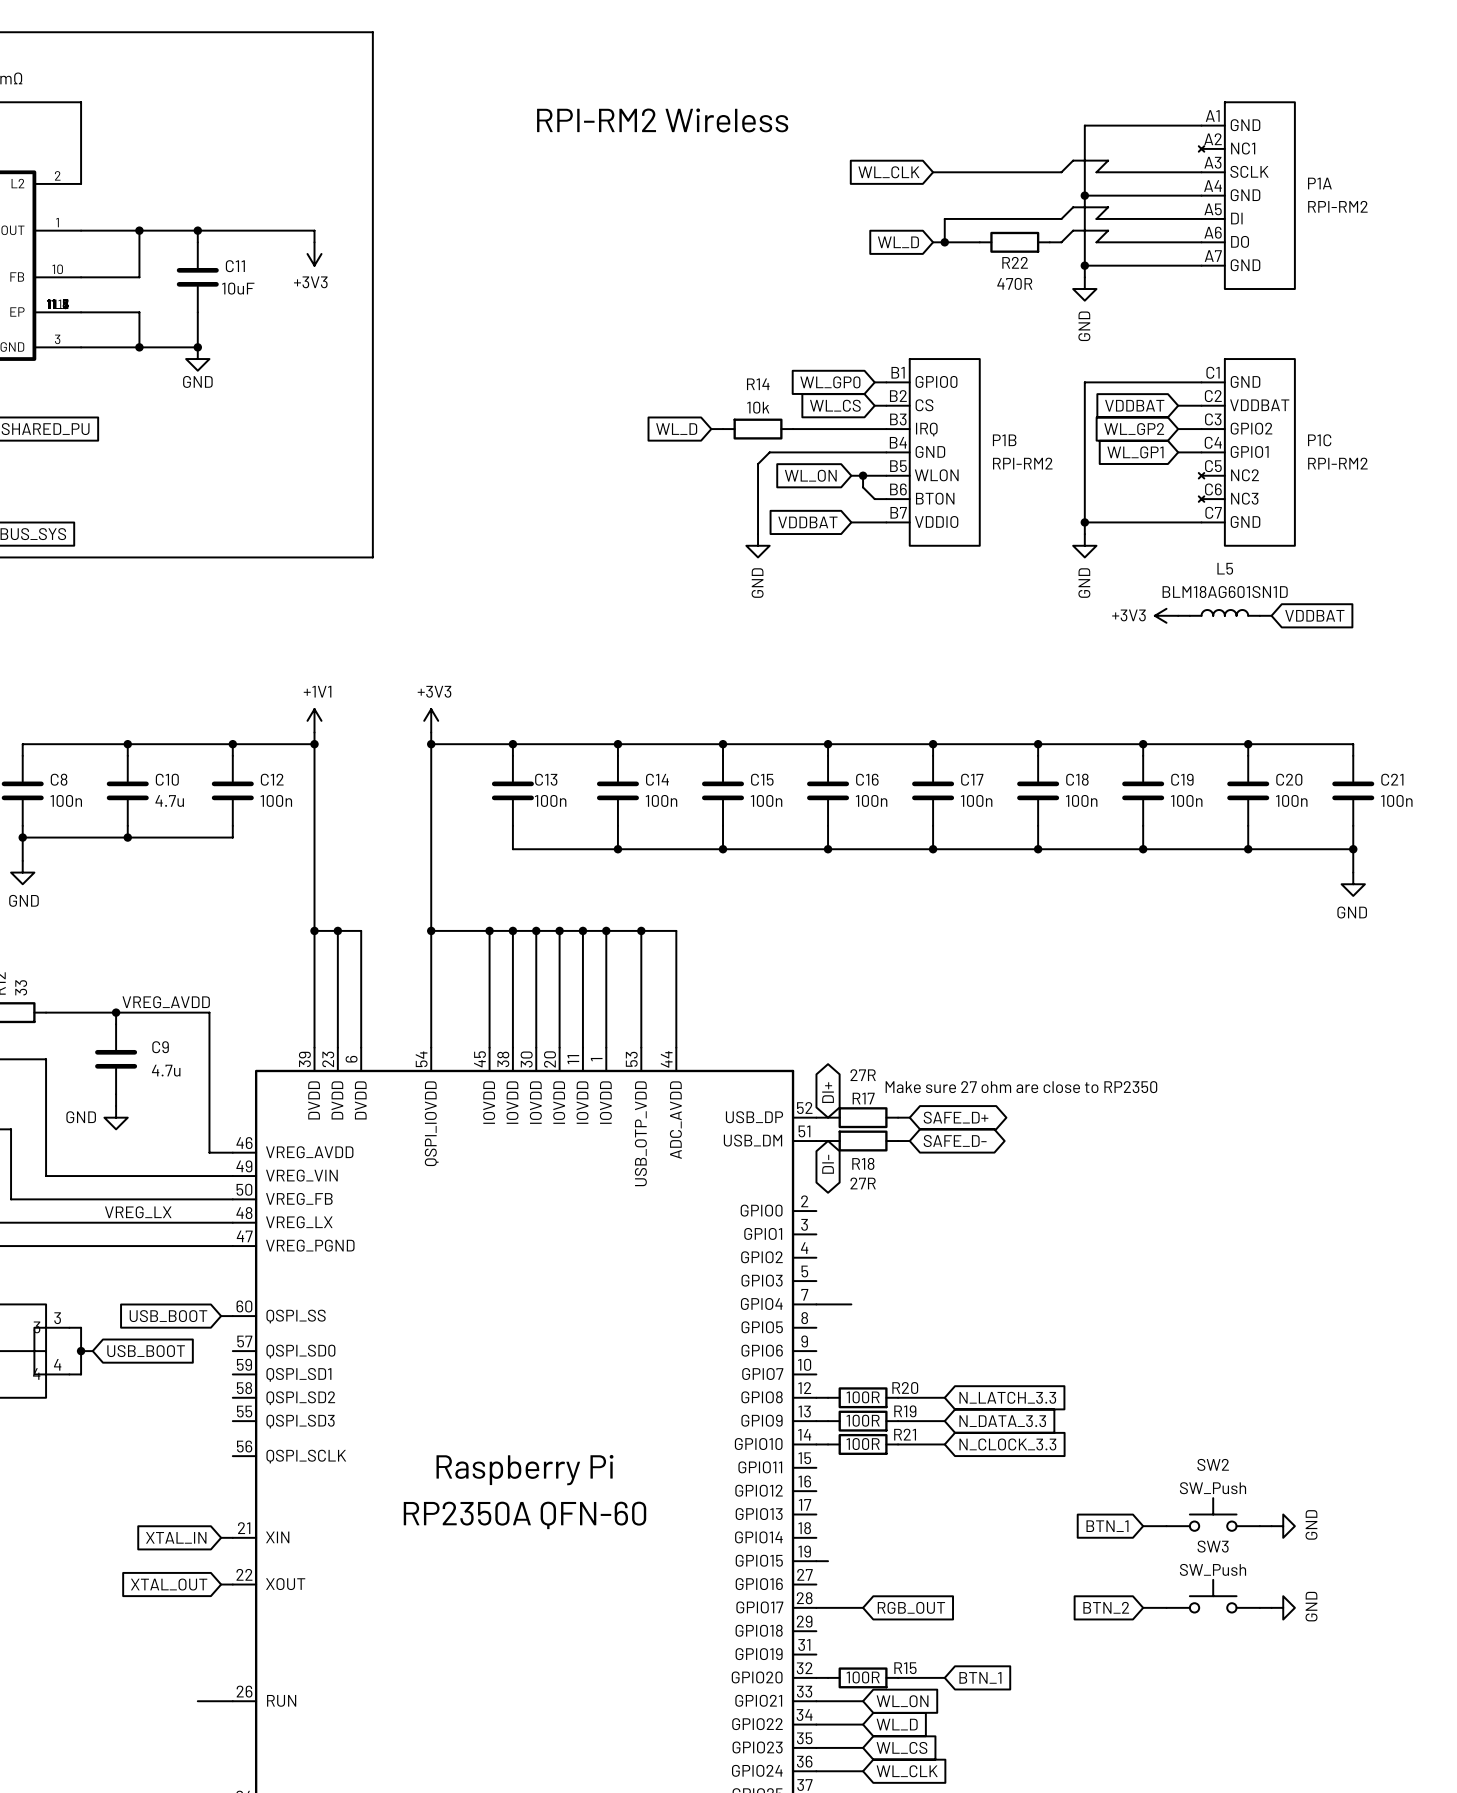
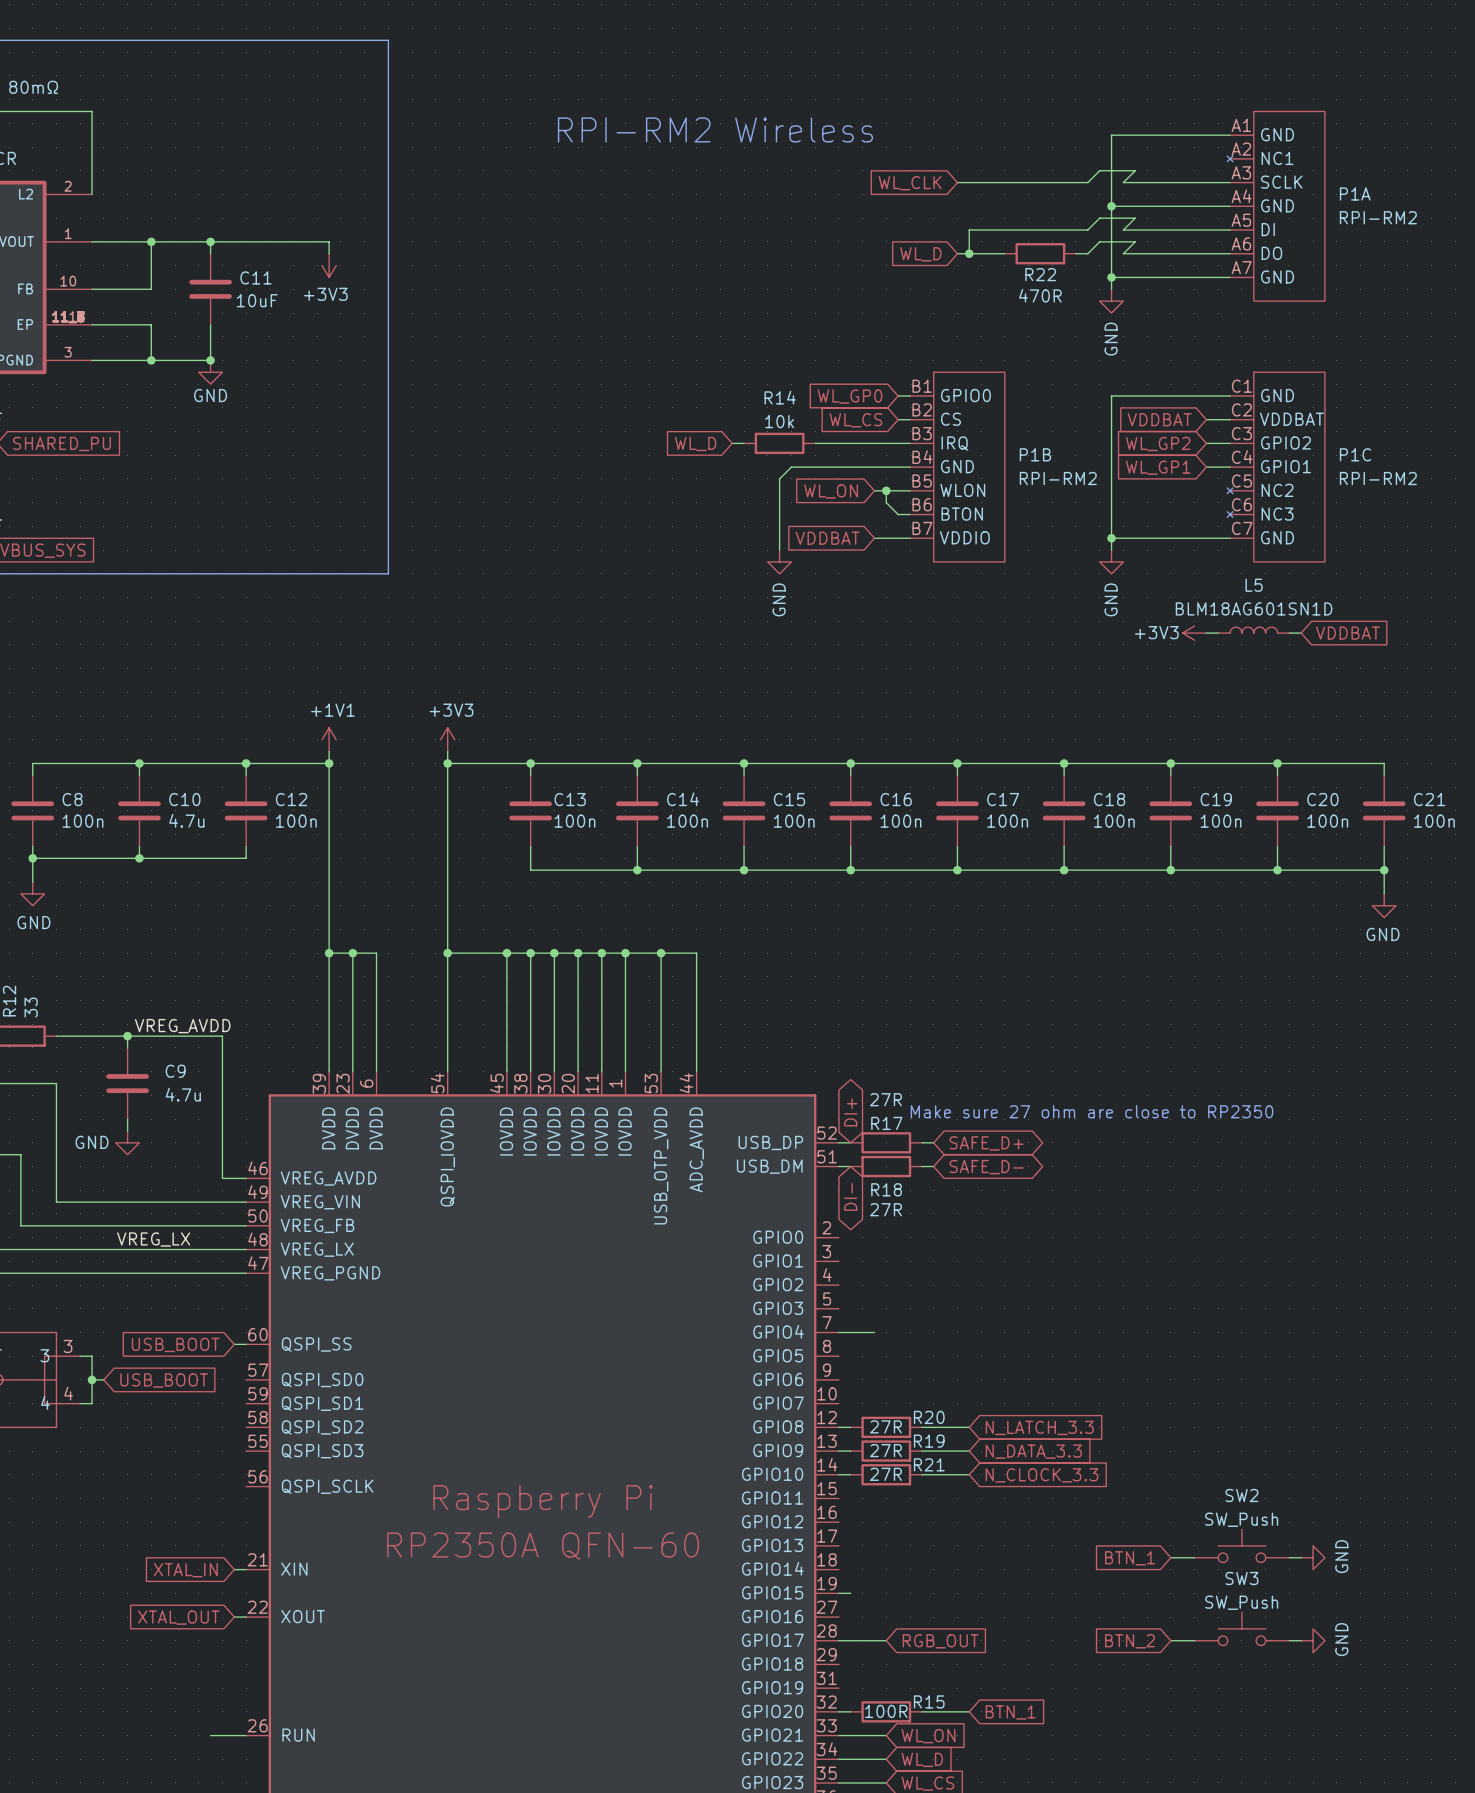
R20 value: 100R (863, 1397) -> 27R (886, 1426)
R19 value: 100R (863, 1420) -> 27R (886, 1450)
R21 value: 100R (863, 1444) -> 27R (886, 1474)

